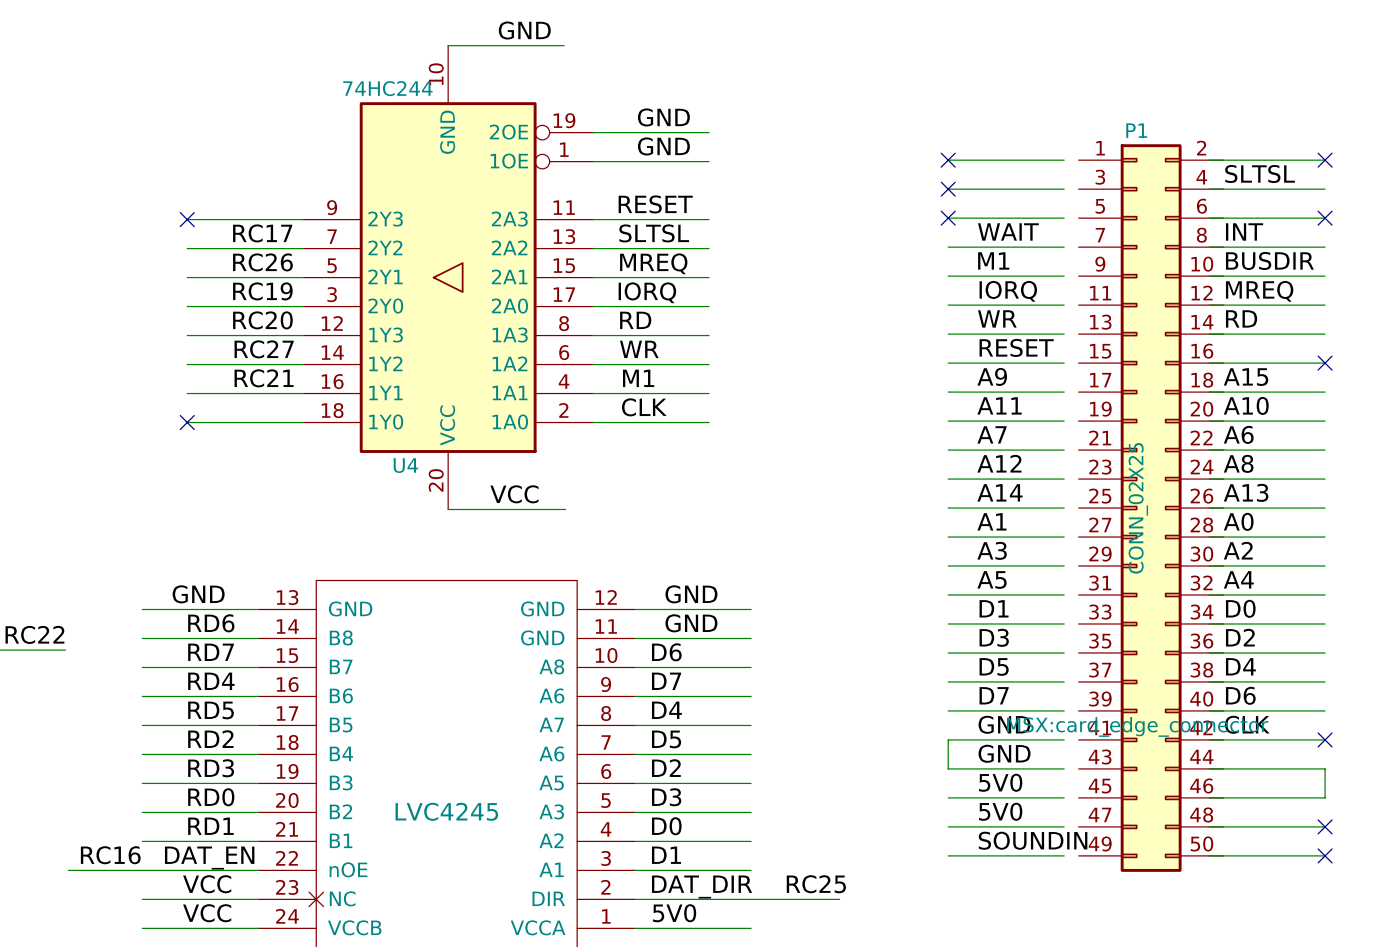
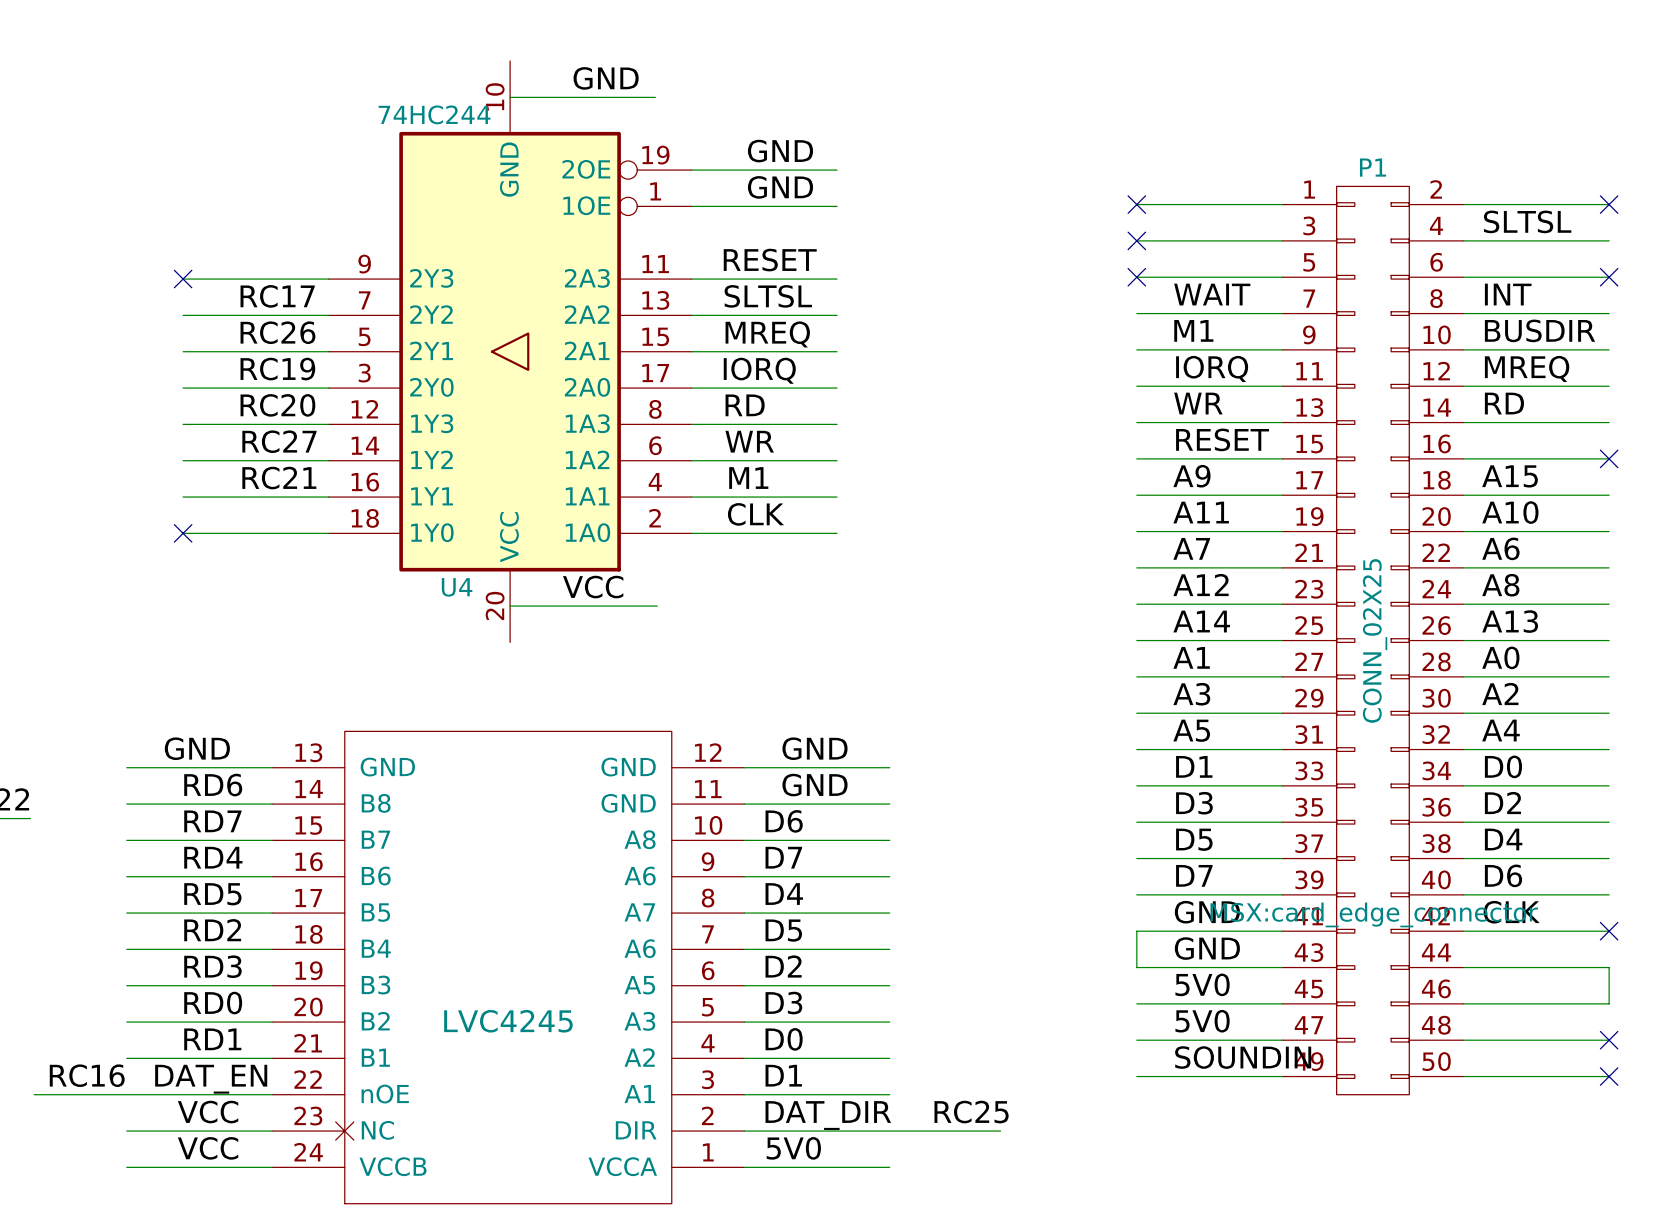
label position: GND (524, 30) -> GND (606, 78)
wire: (448, 45) (564, 45) -> (510, 97) (655, 97)
P1 symbol: [1078, 144, 1224, 872] -> [1282, 186, 1464, 1095]
label position: VCC (514, 494) -> VCC (593, 587)
wire: (448, 509) (565, 509) -> (510, 606) (657, 606)

